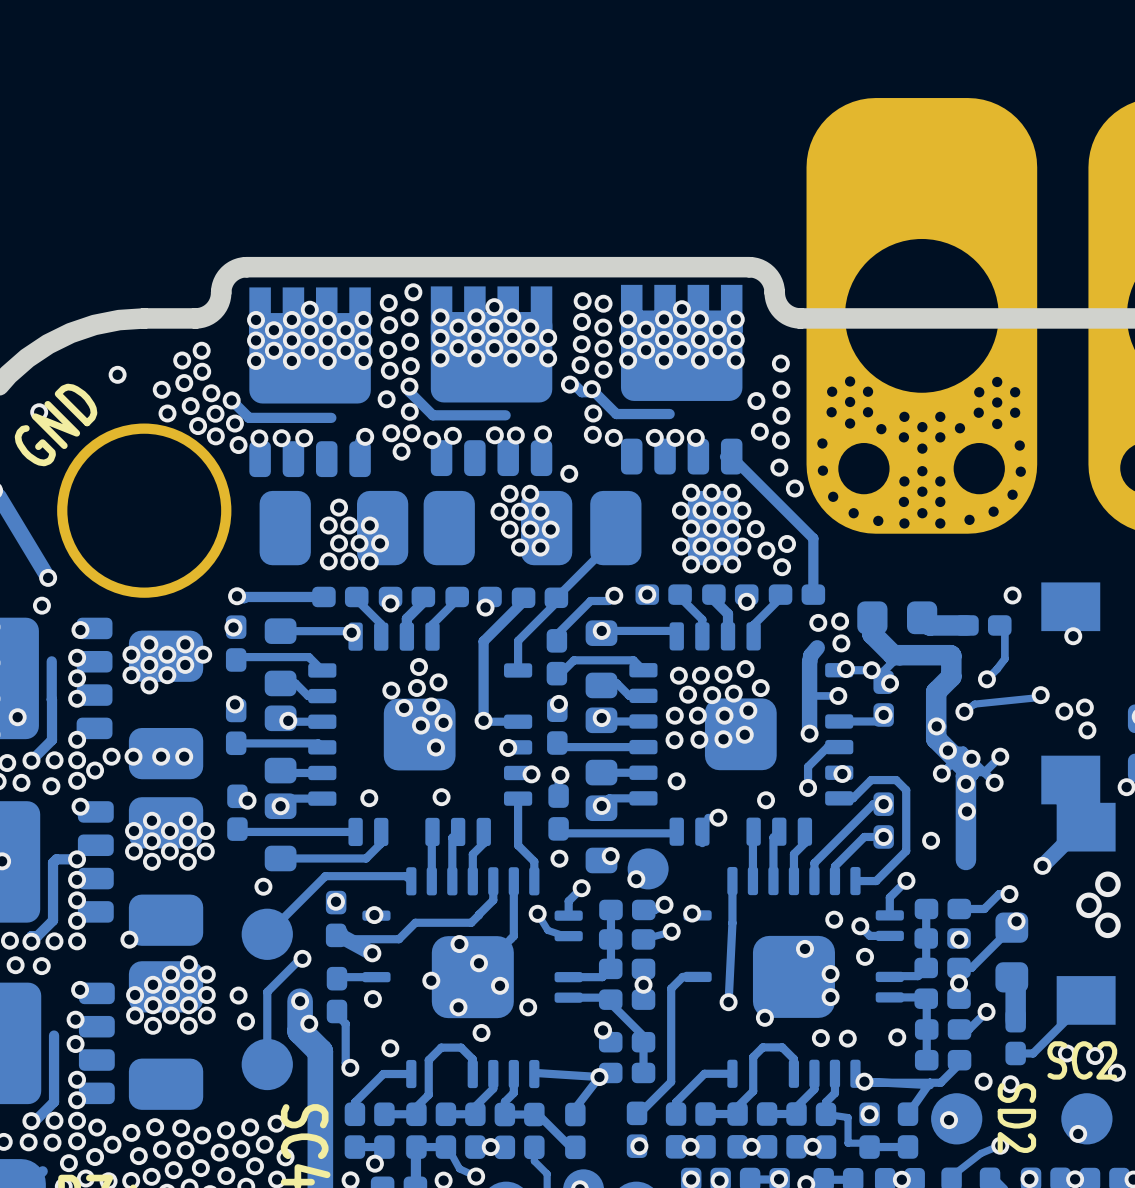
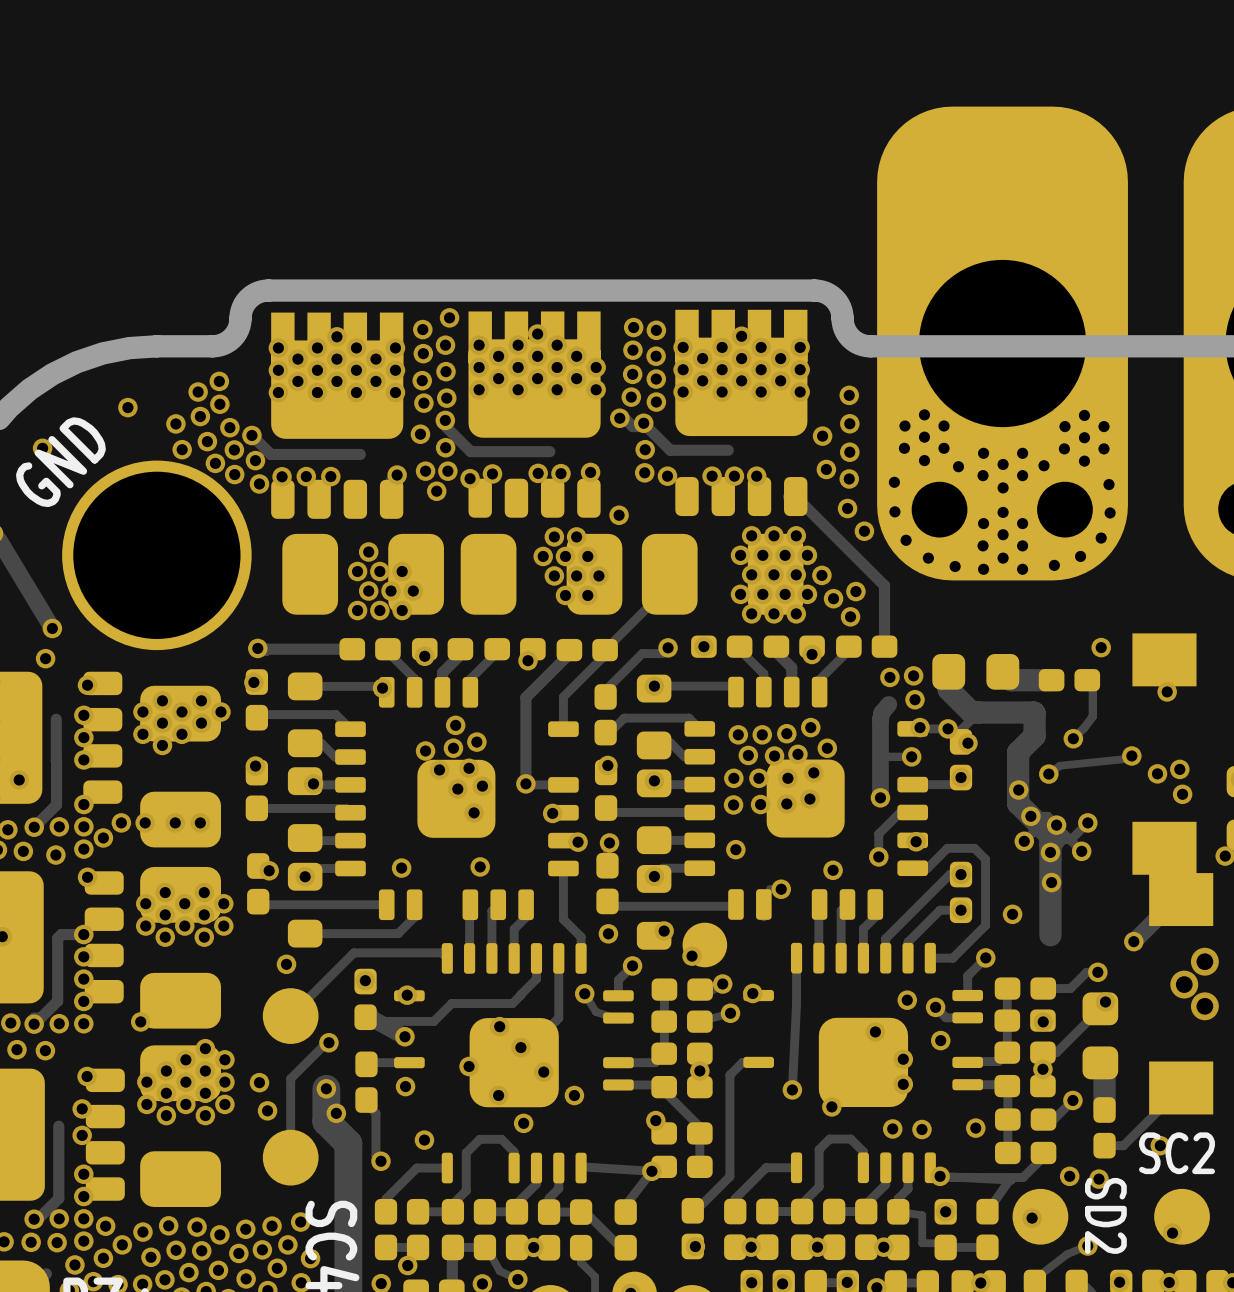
via: (1095, 1056) -> none
via: (1116, 1072) -> none

